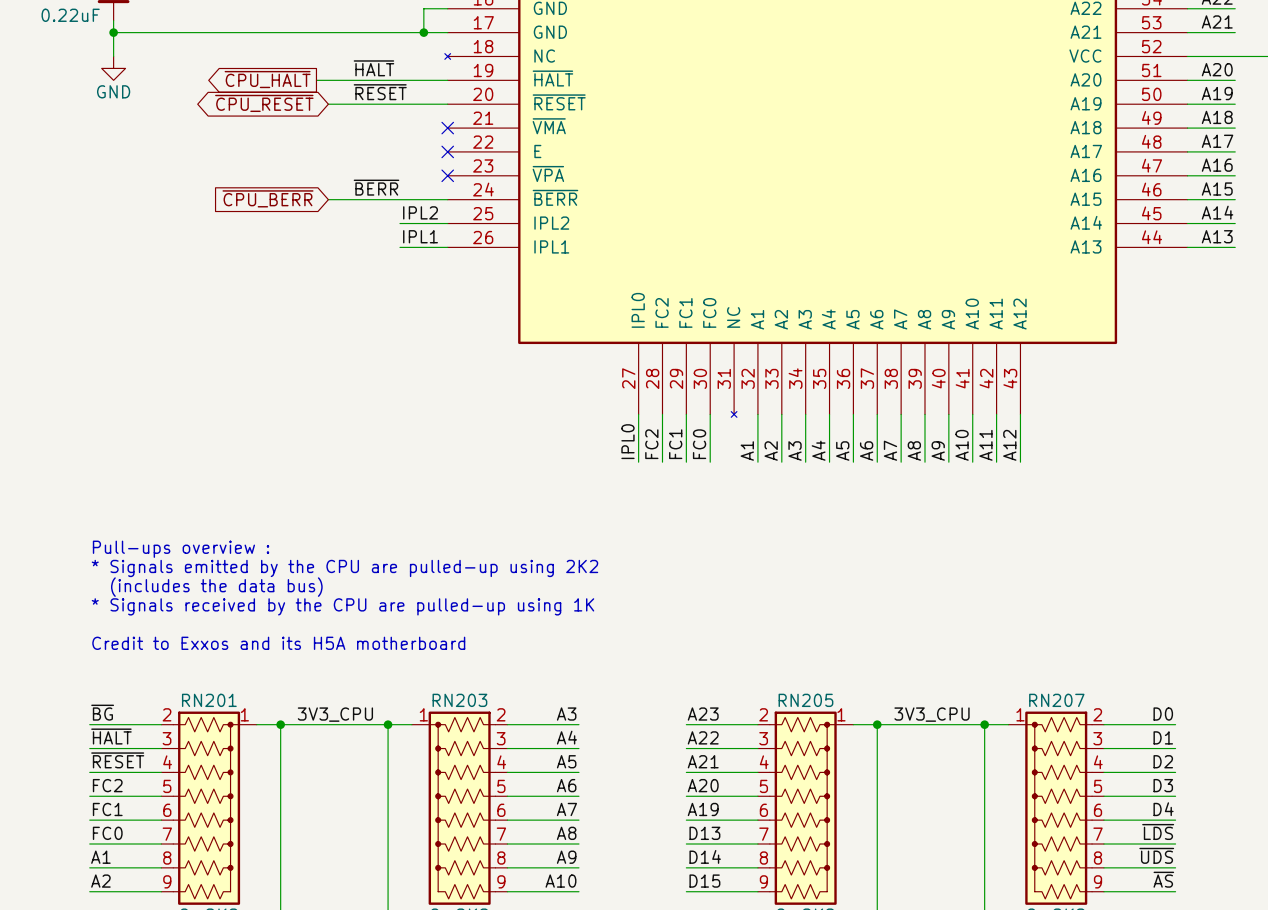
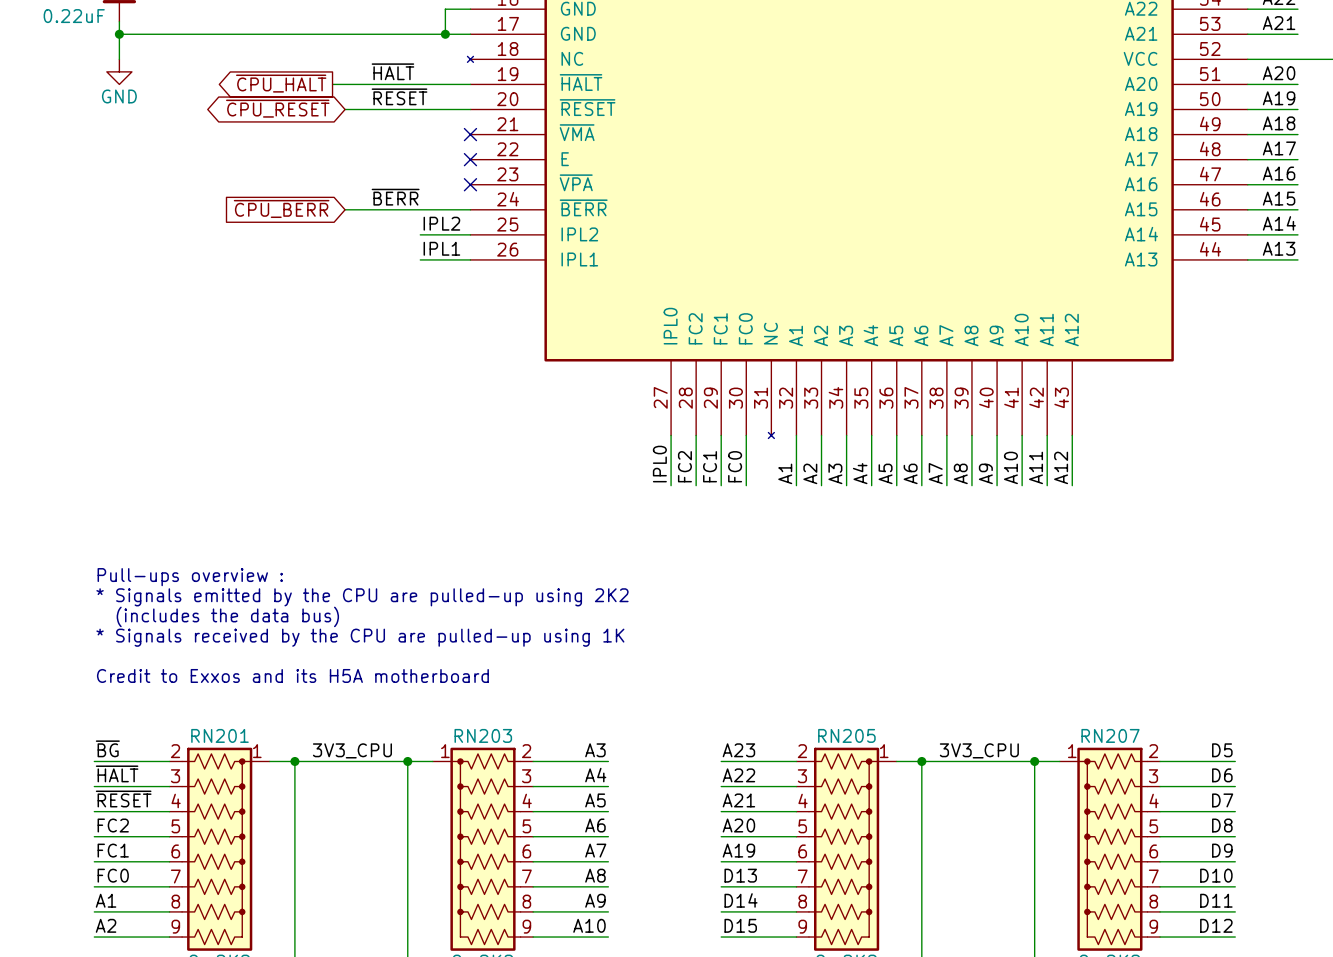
label: D0 (1163, 714) -> D5 (1222, 750)
label: D1 (1163, 737) -> D6 (1222, 775)
label: D2 (1163, 761) -> D7 (1222, 800)
label: D3 (1163, 785) -> D8 (1222, 825)
label: D4 (1163, 809) -> D9 (1222, 850)
label: ~{LDS} (1158, 831) -> D10 (1216, 875)
label: ~{UDS} (1156, 855) -> D11 (1216, 900)
label: ~{AS} (1163, 879) -> D12 (1216, 925)

